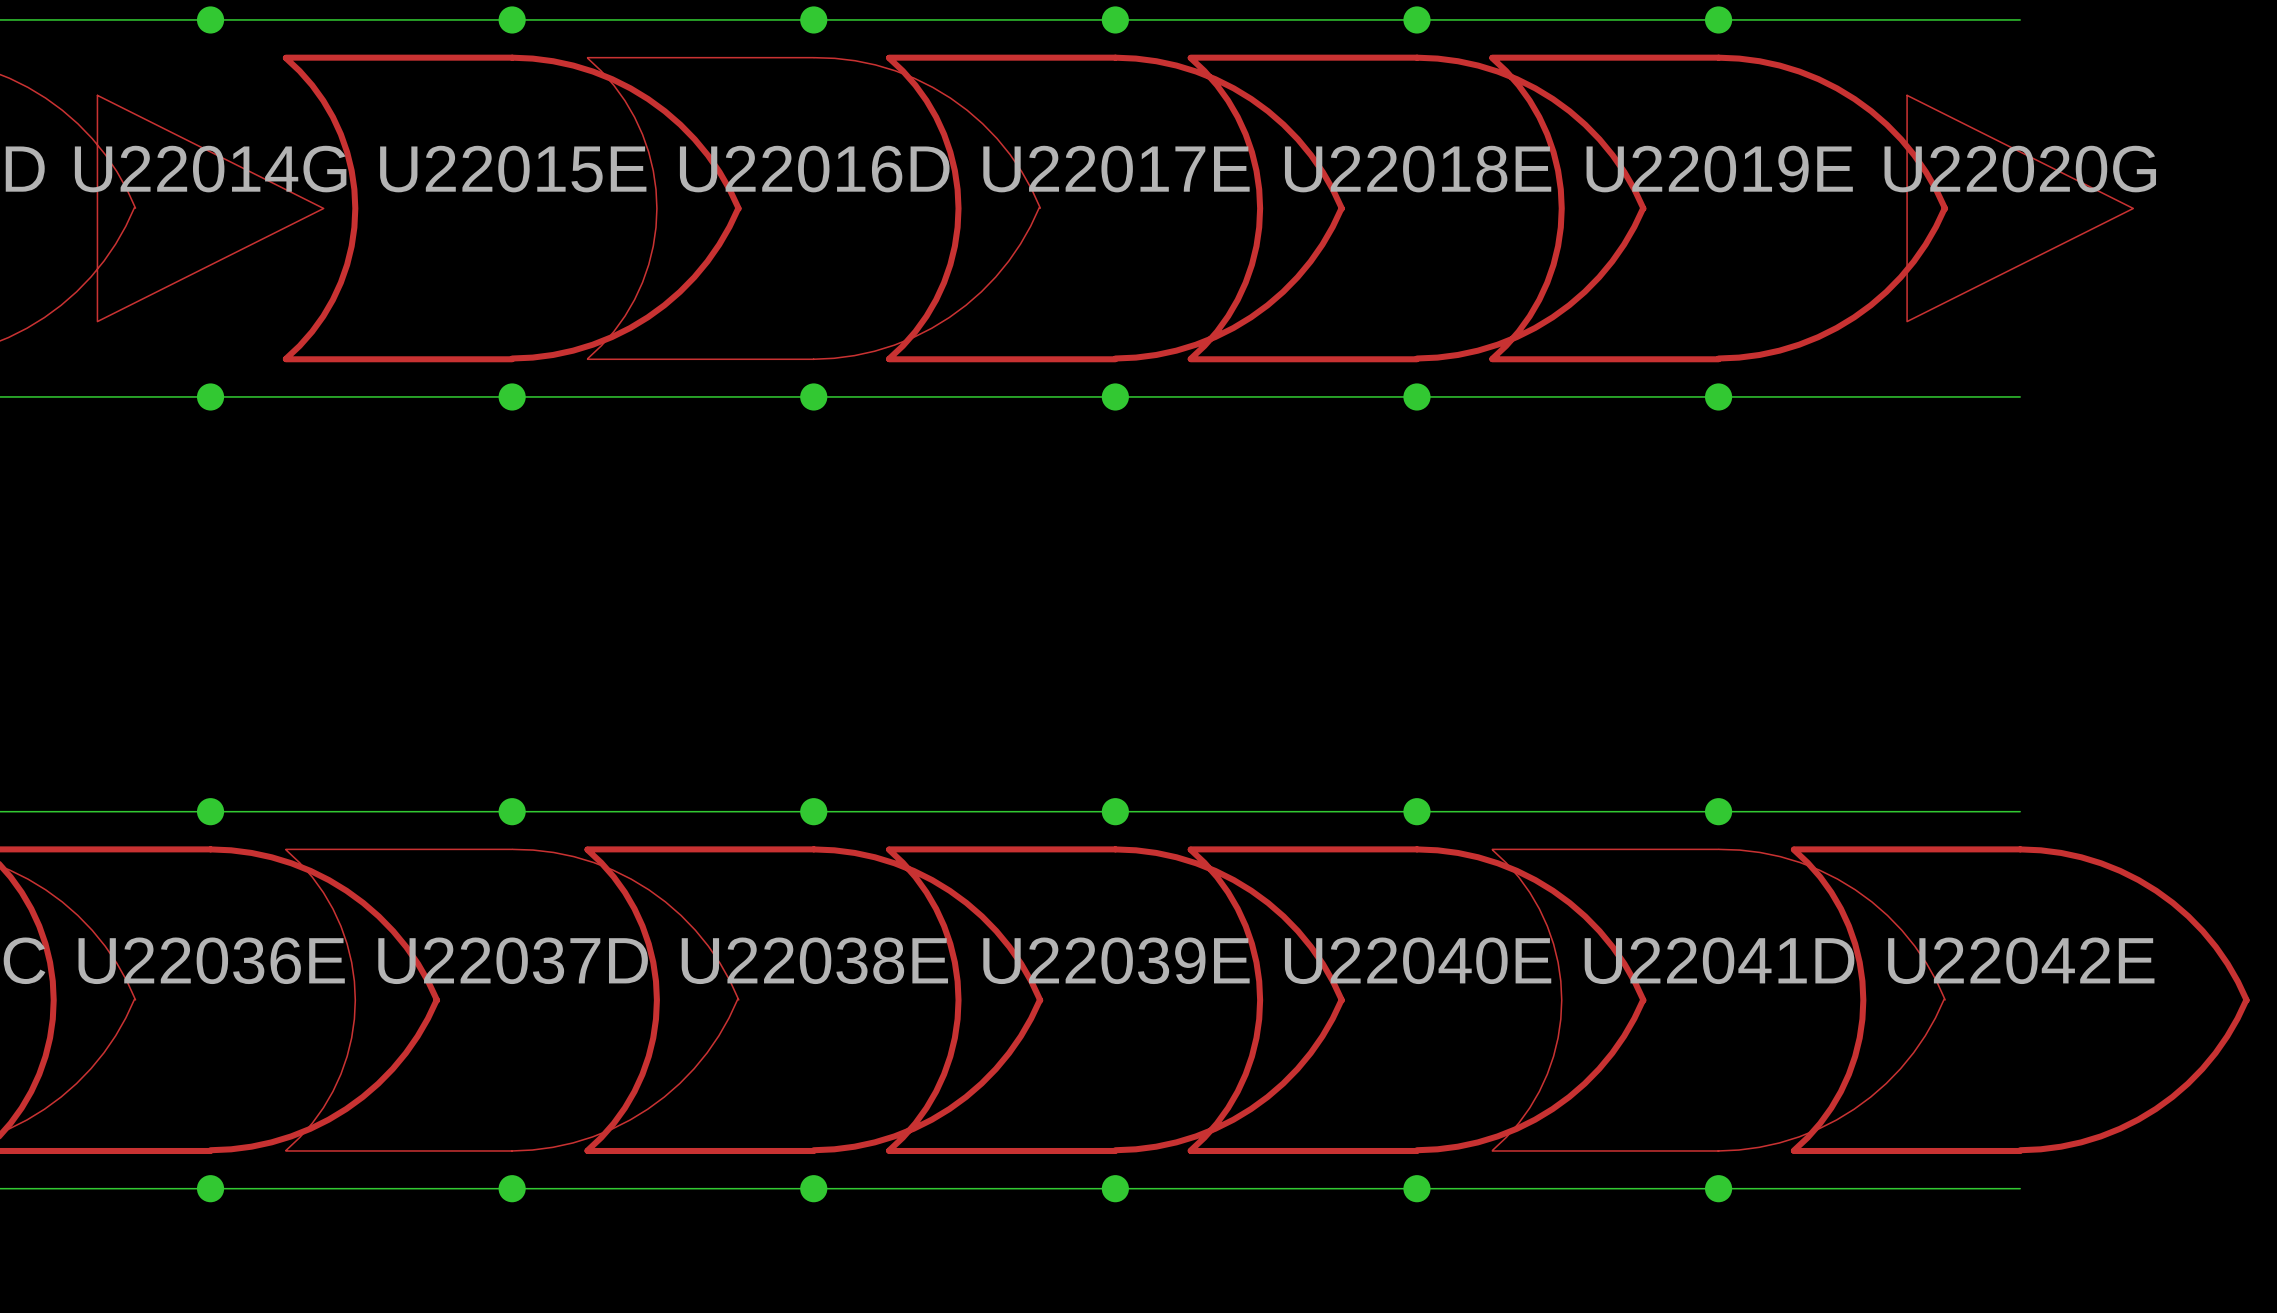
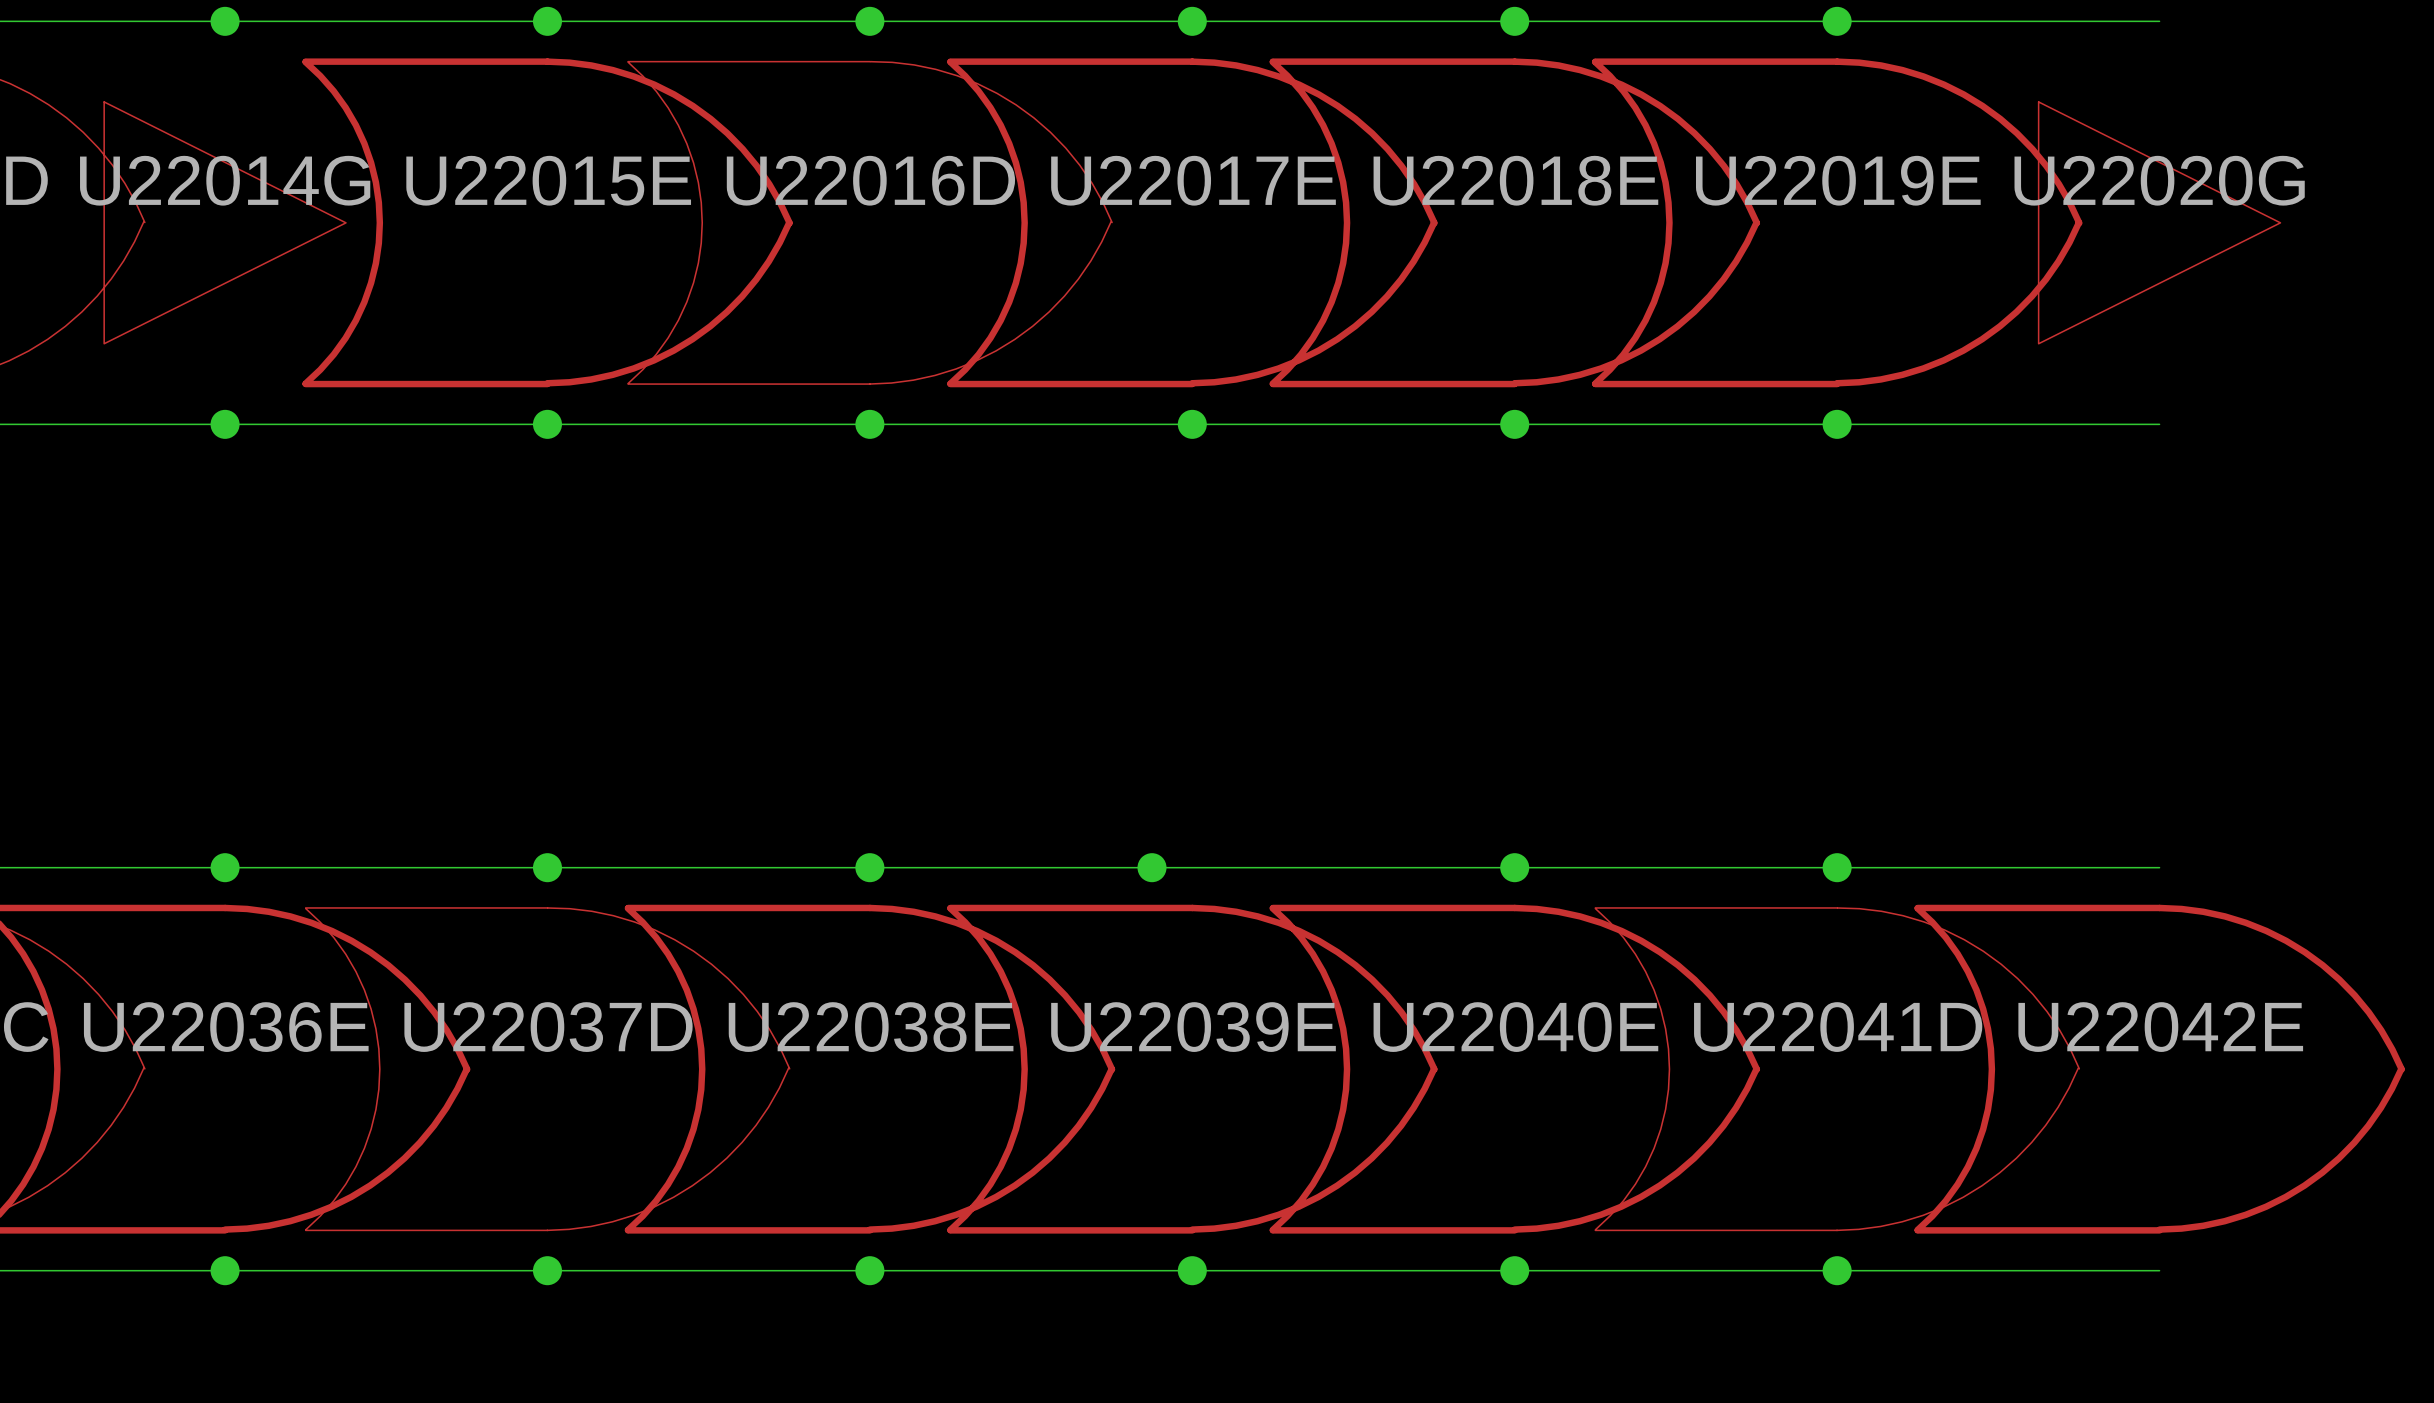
junction position: (1115, 811) -> (1152, 867)

